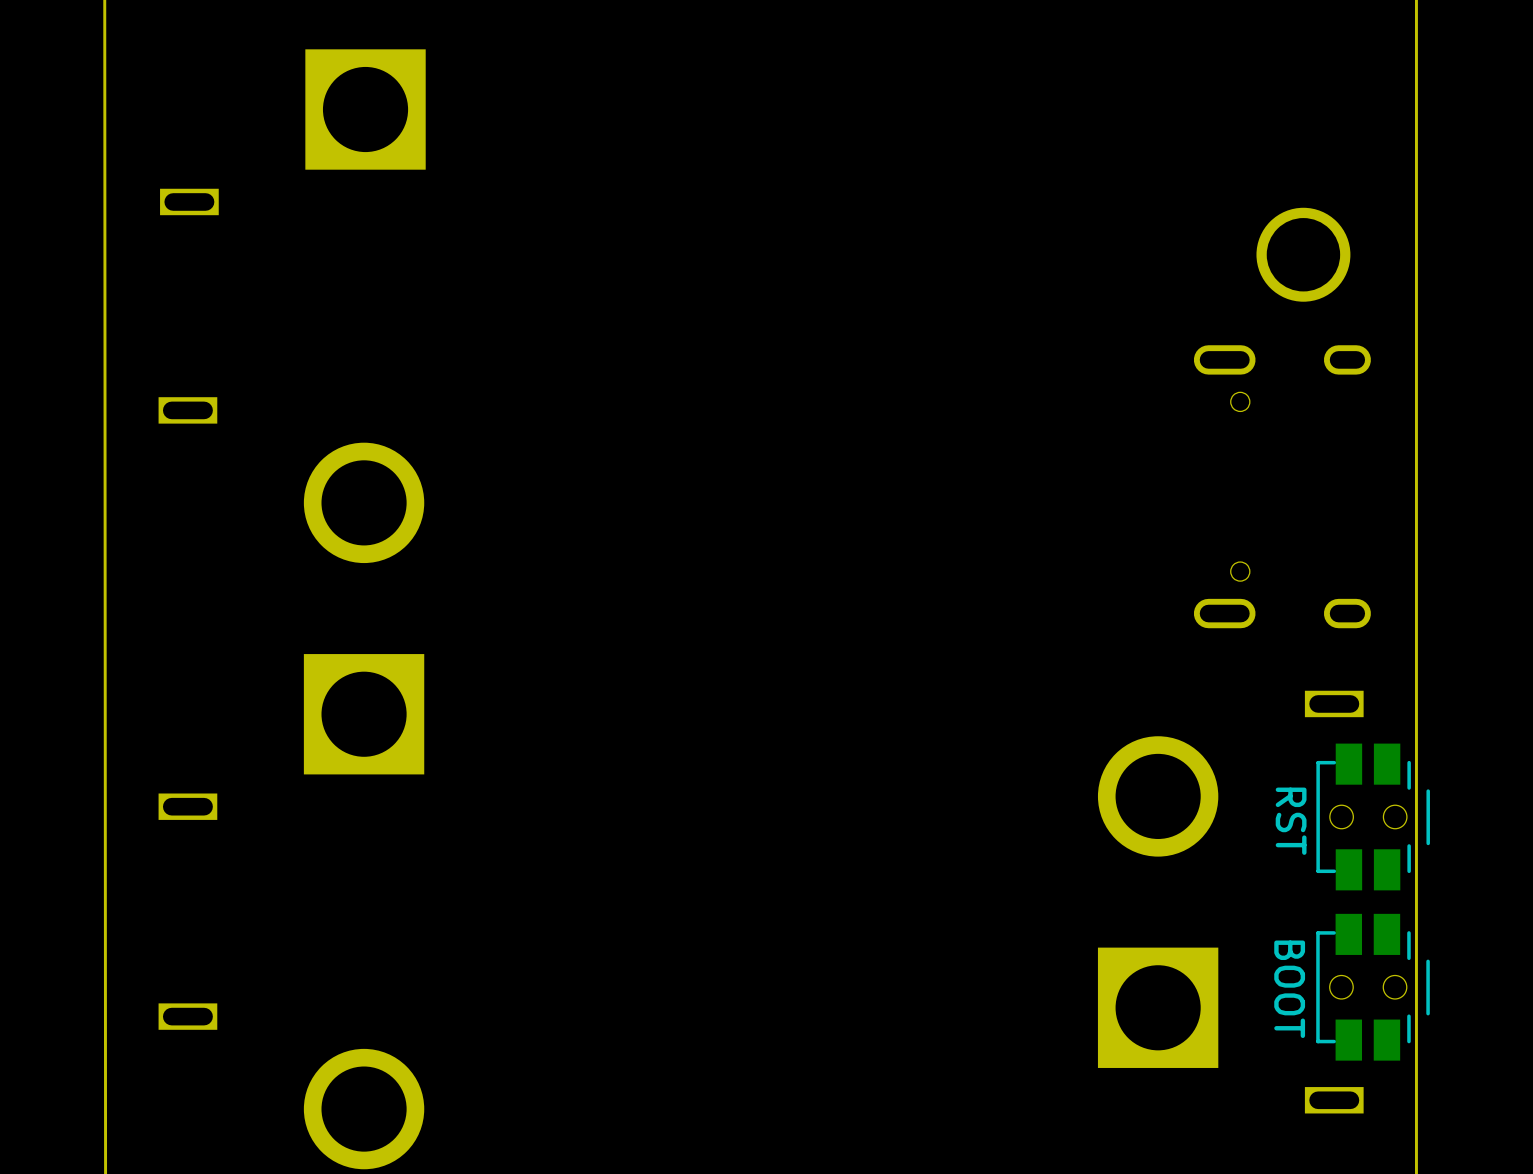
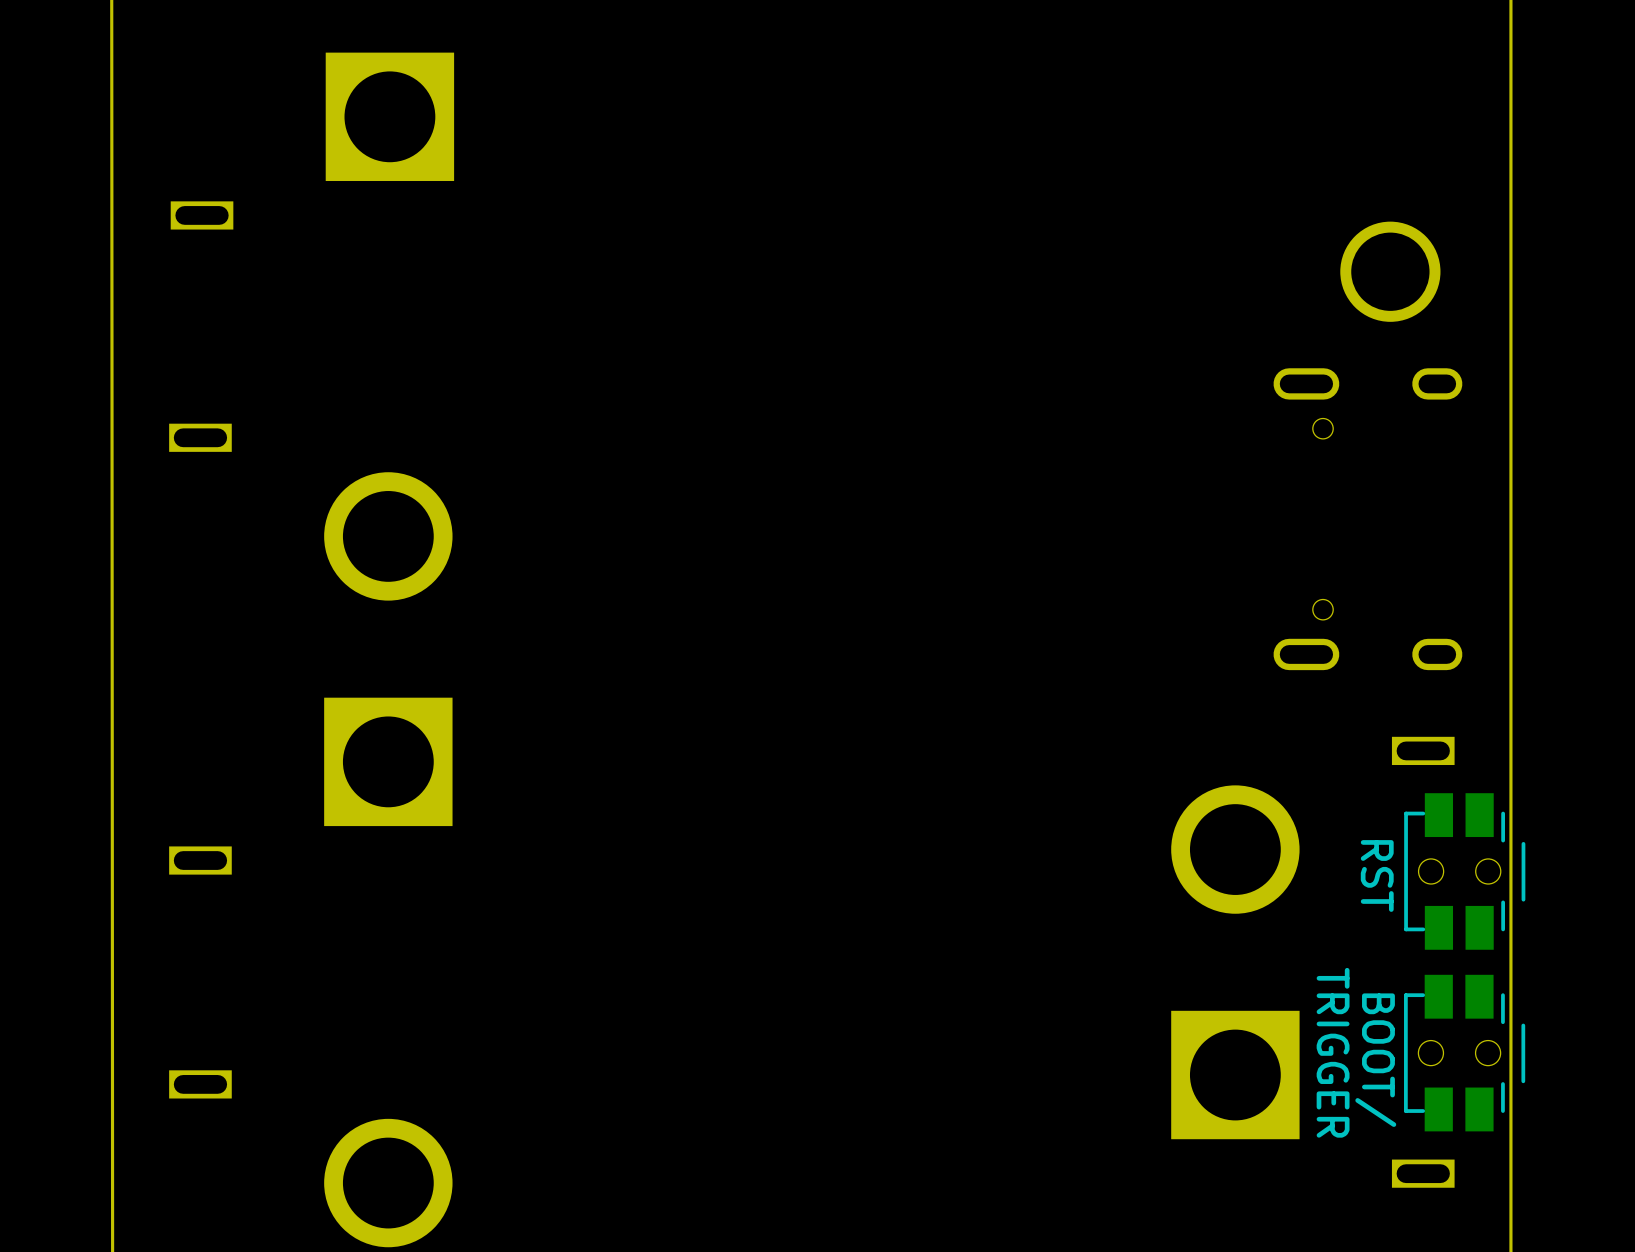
text: none -> TRIGGER (1333, 1052)
text: BOOT (1289, 989) -> BOOT/ (1375, 1060)

